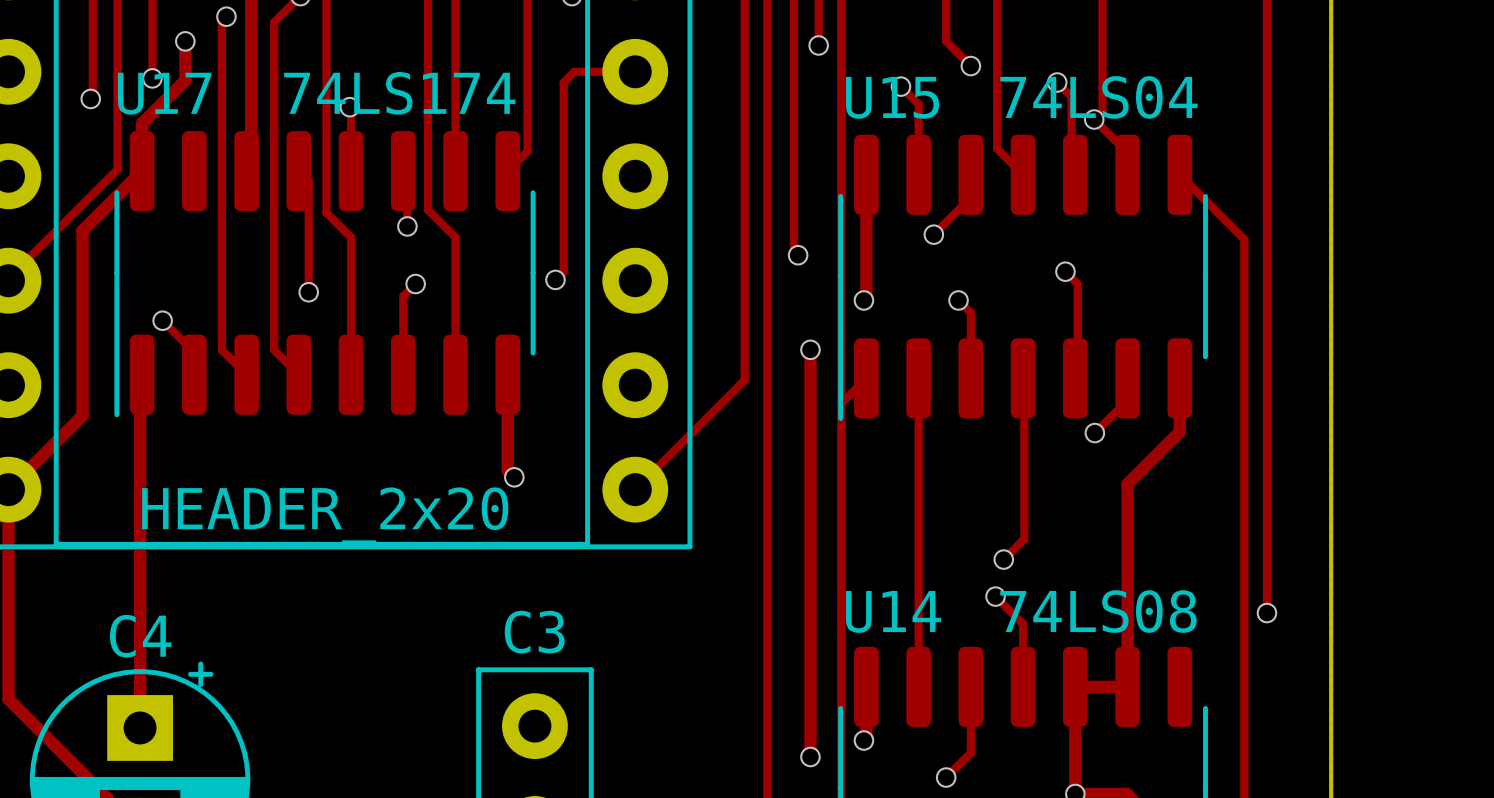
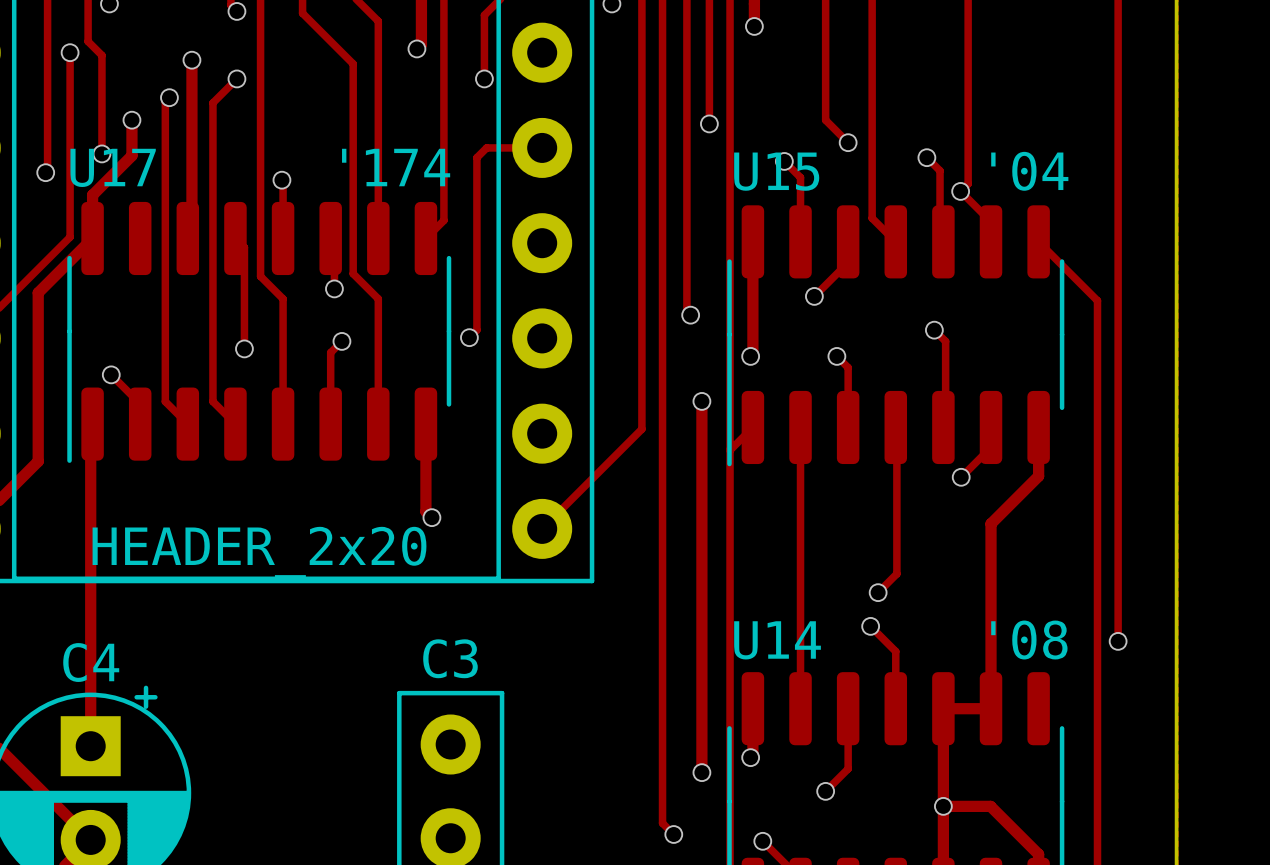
U17 value: 74LS174 (399, 93) -> '174 (396, 167)
U15 value: 74LS04 (1098, 97) -> '04 (1029, 171)
U14 value: 74LS08 (1098, 611) -> '08 (1029, 640)

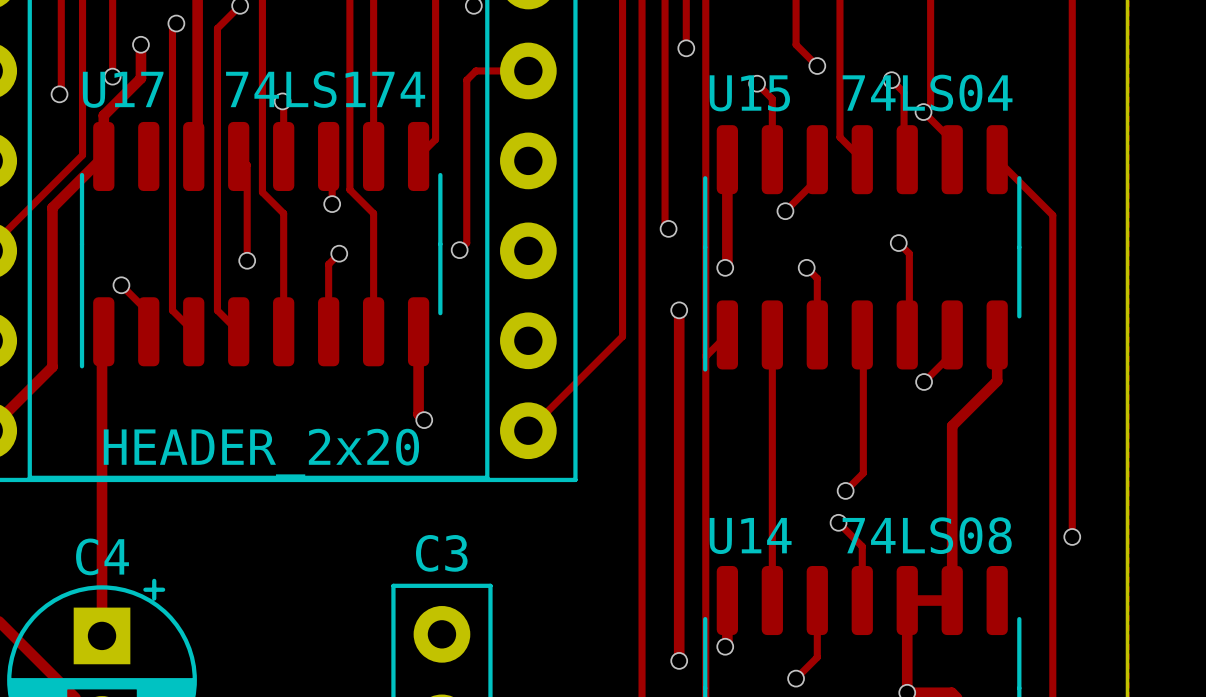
U17 value: '174 (396, 167) -> 74LS174 (325, 89)
U15 value: '04 (1029, 171) -> 74LS04 (927, 93)
U14 value: '08 (1029, 640) -> 74LS08 (927, 535)

